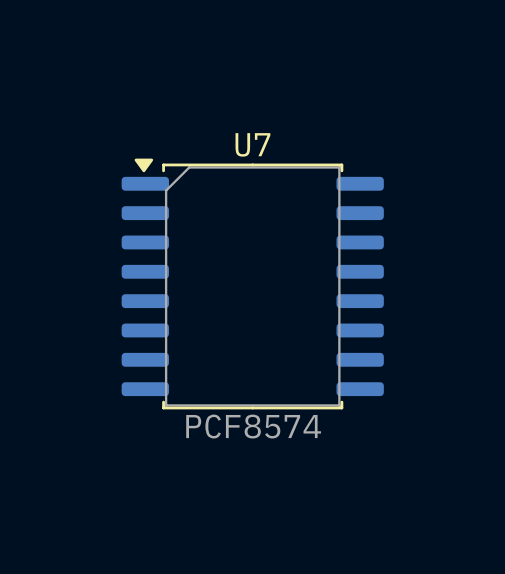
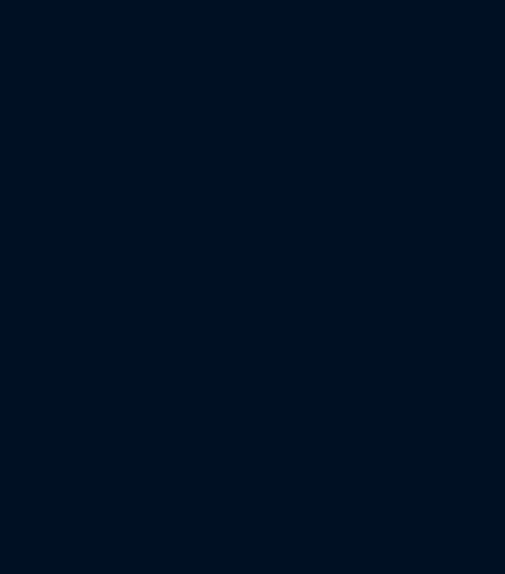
U7: PCF8574 (252, 283) -> none

